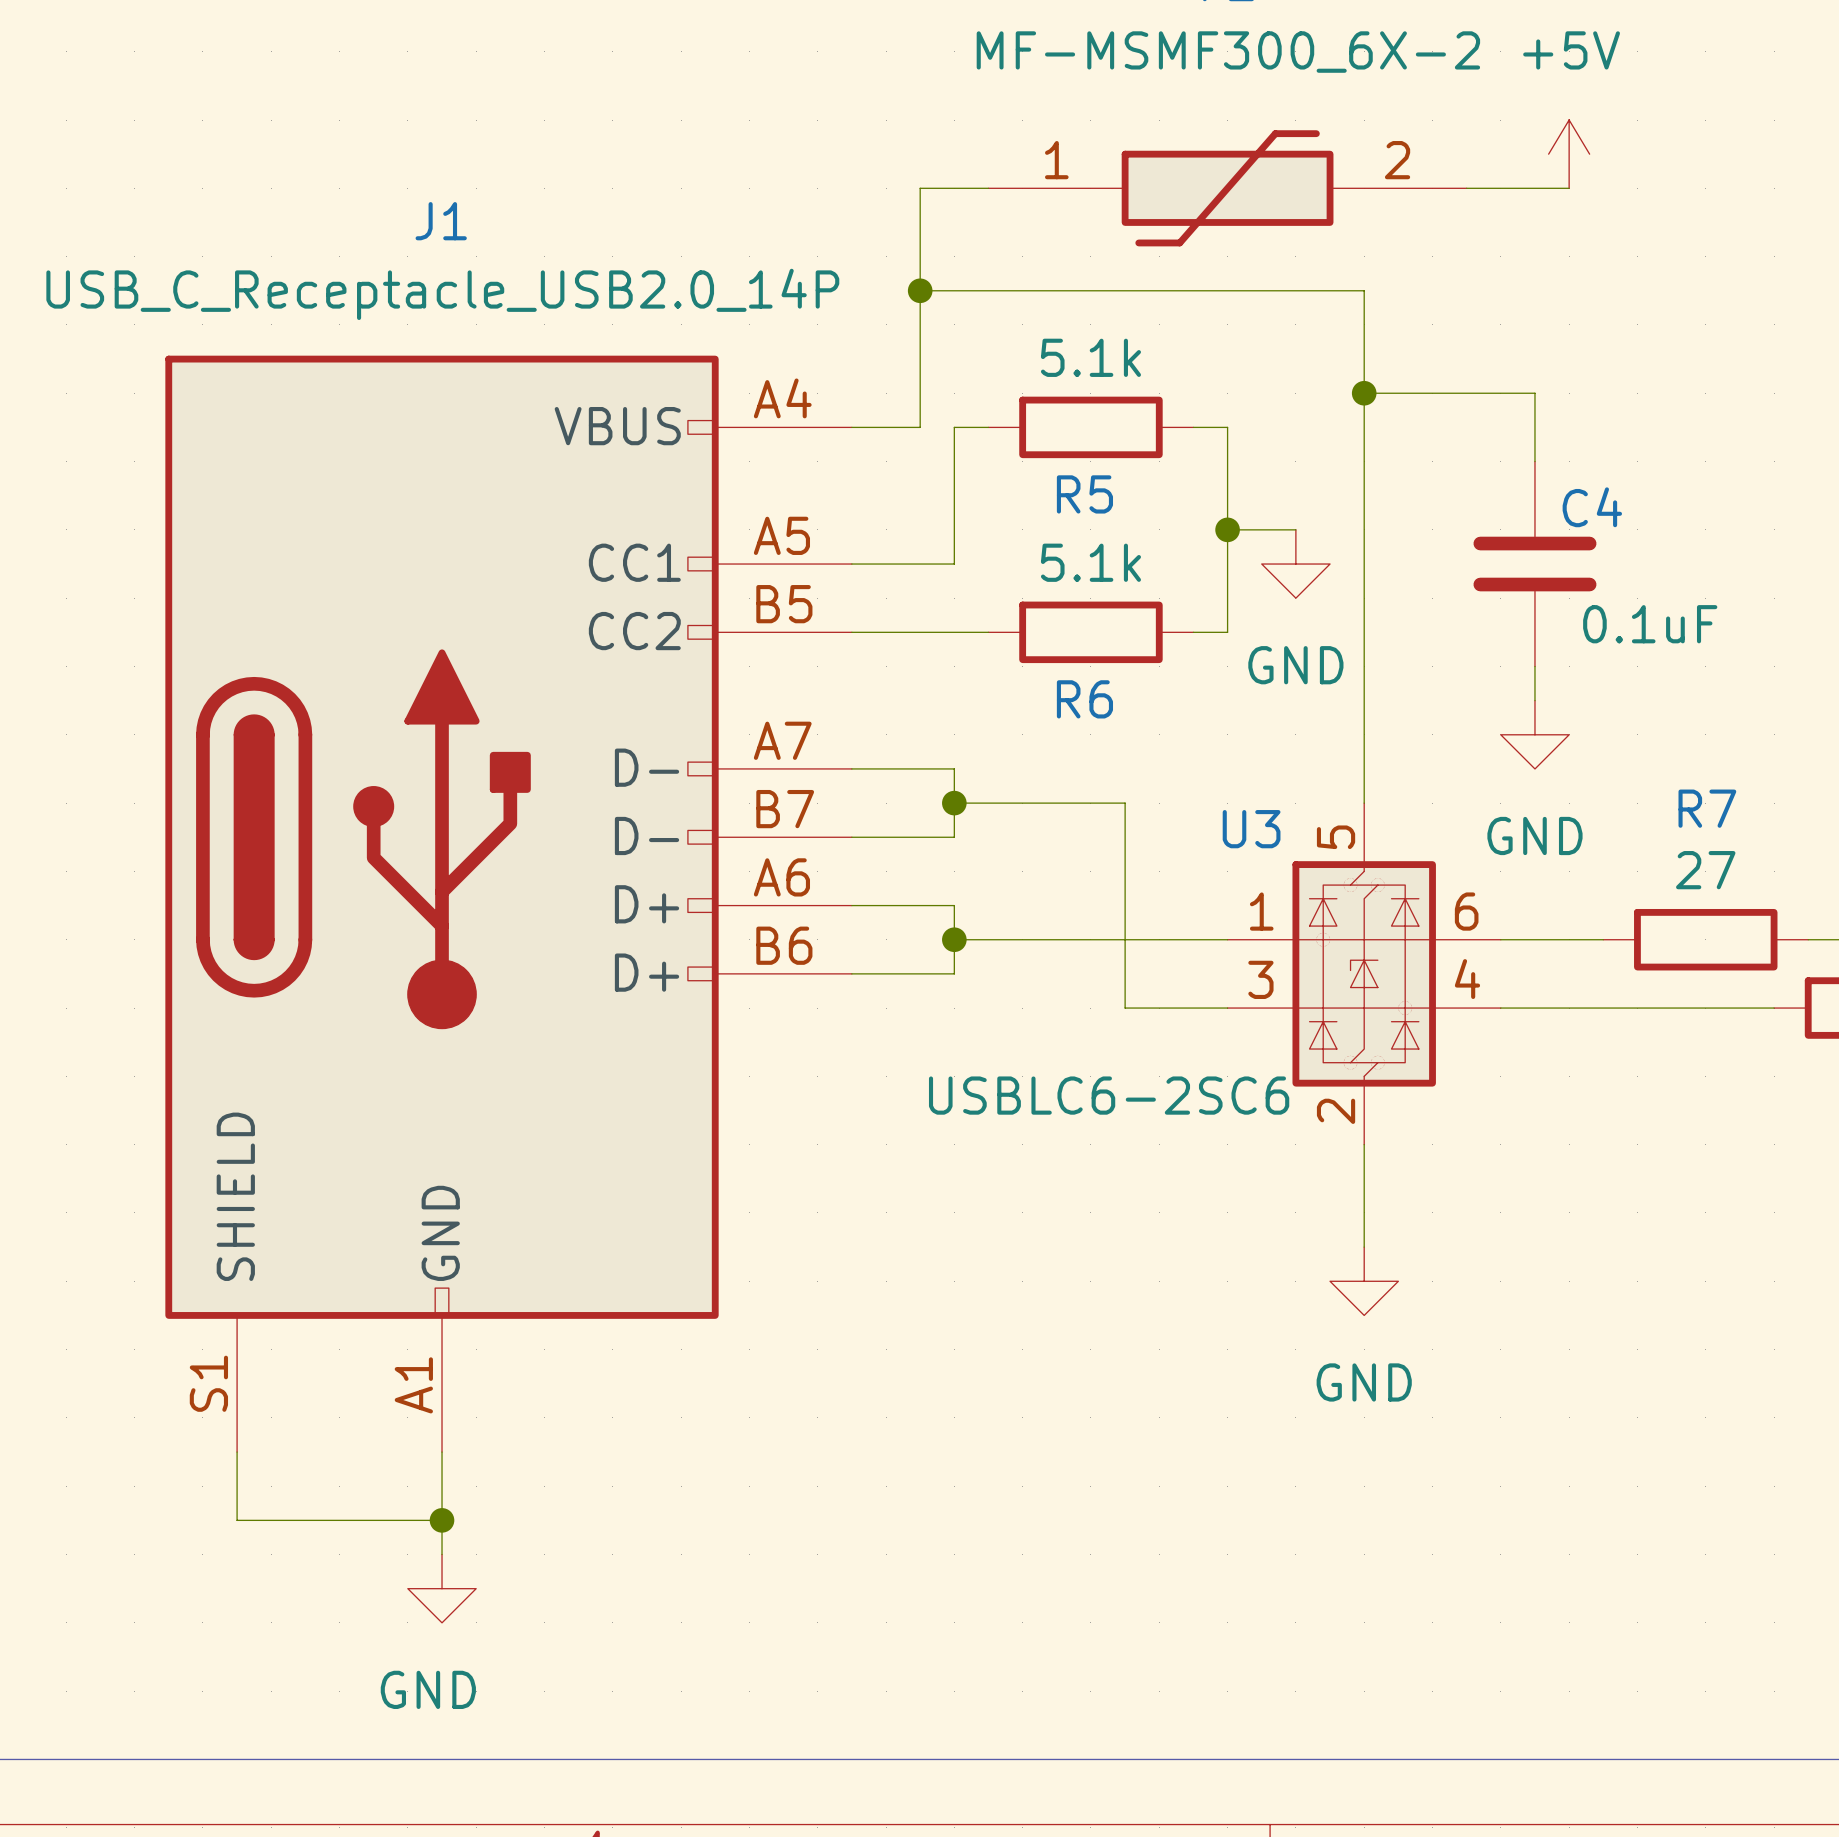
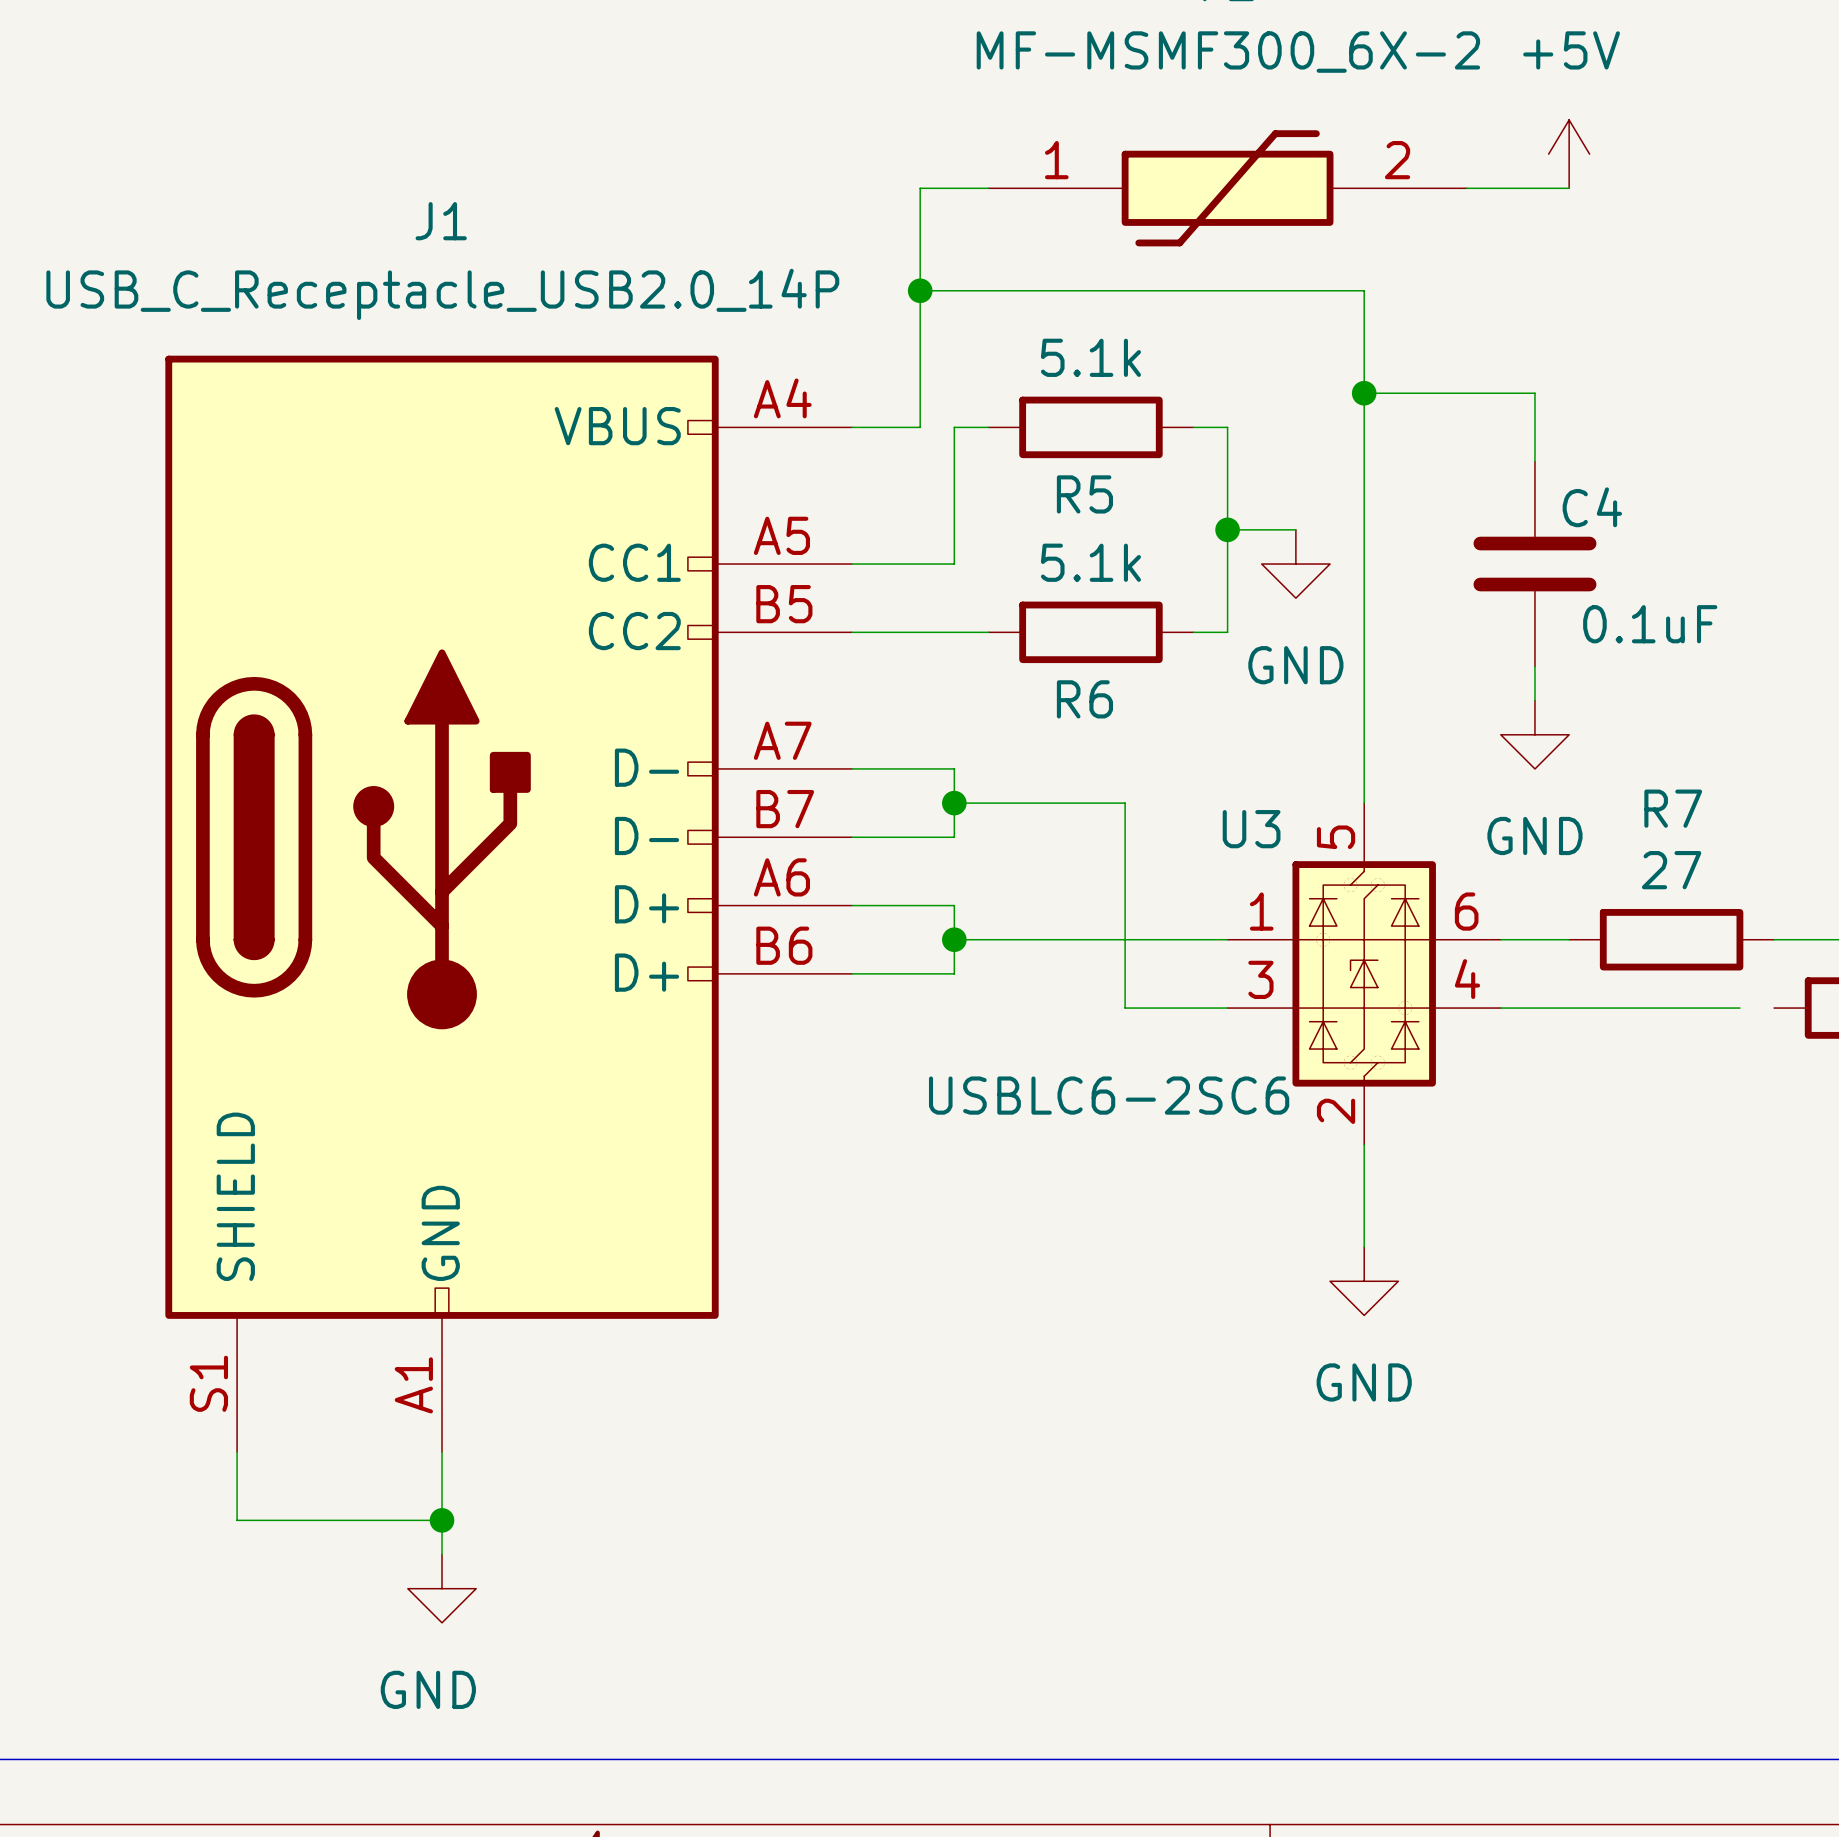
R7 position: (1705, 939) -> (1671, 939)
wire: (1739, 1008) (1774, 1008) -> none

